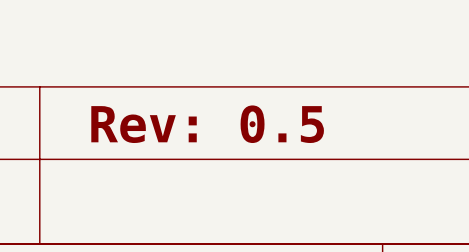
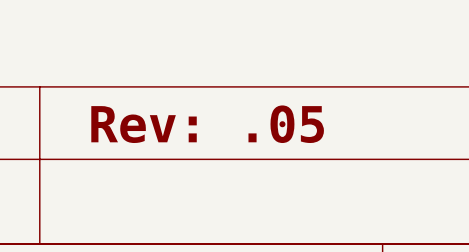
title block: Rev: 0.5 (207, 124) -> Rev: .05 (207, 124)

